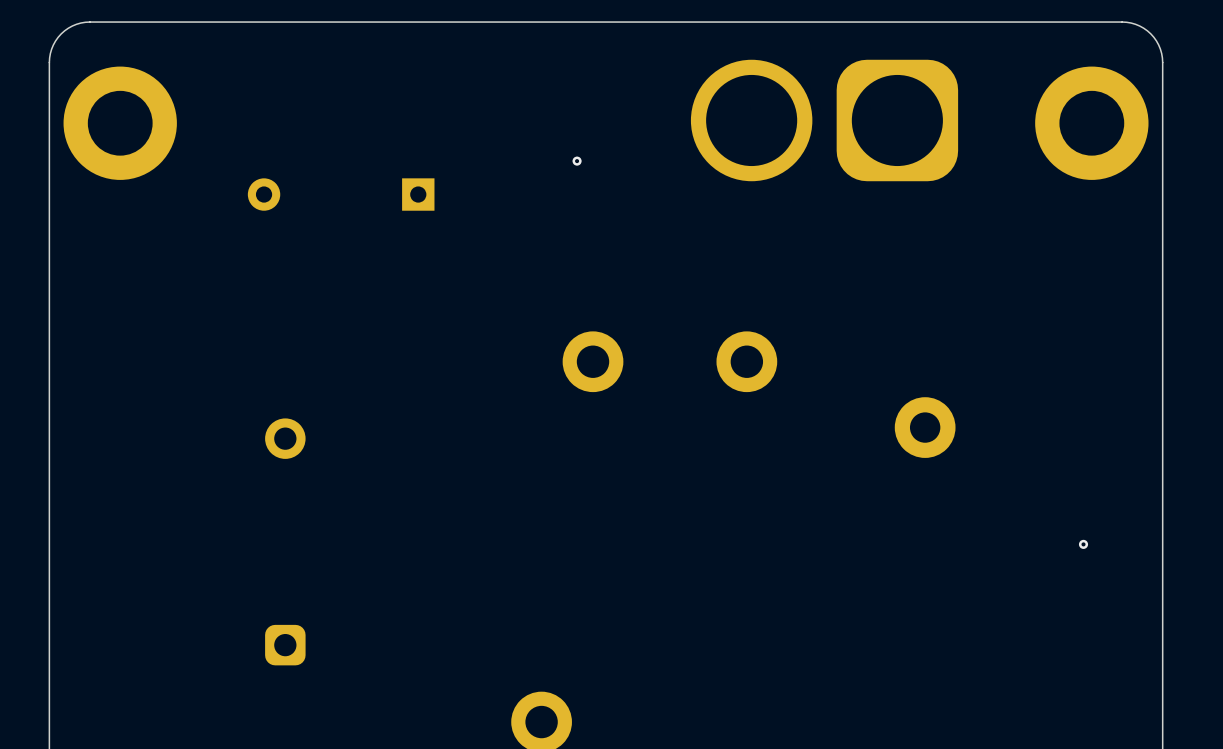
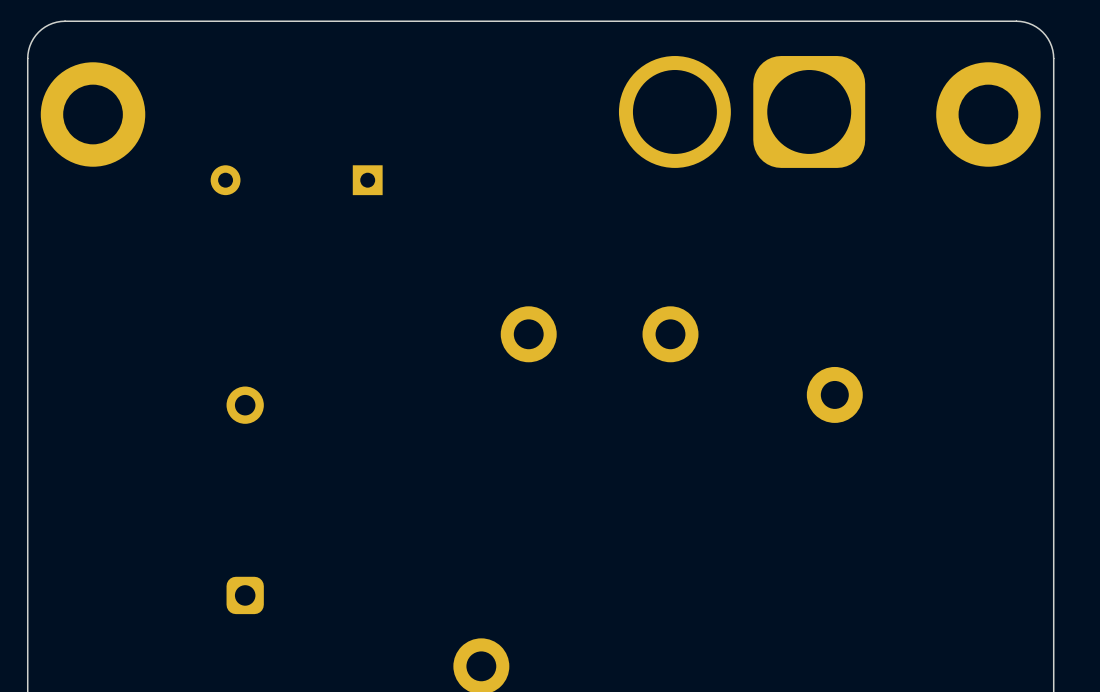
via: (577, 161) -> none
via: (1083, 544) -> none

